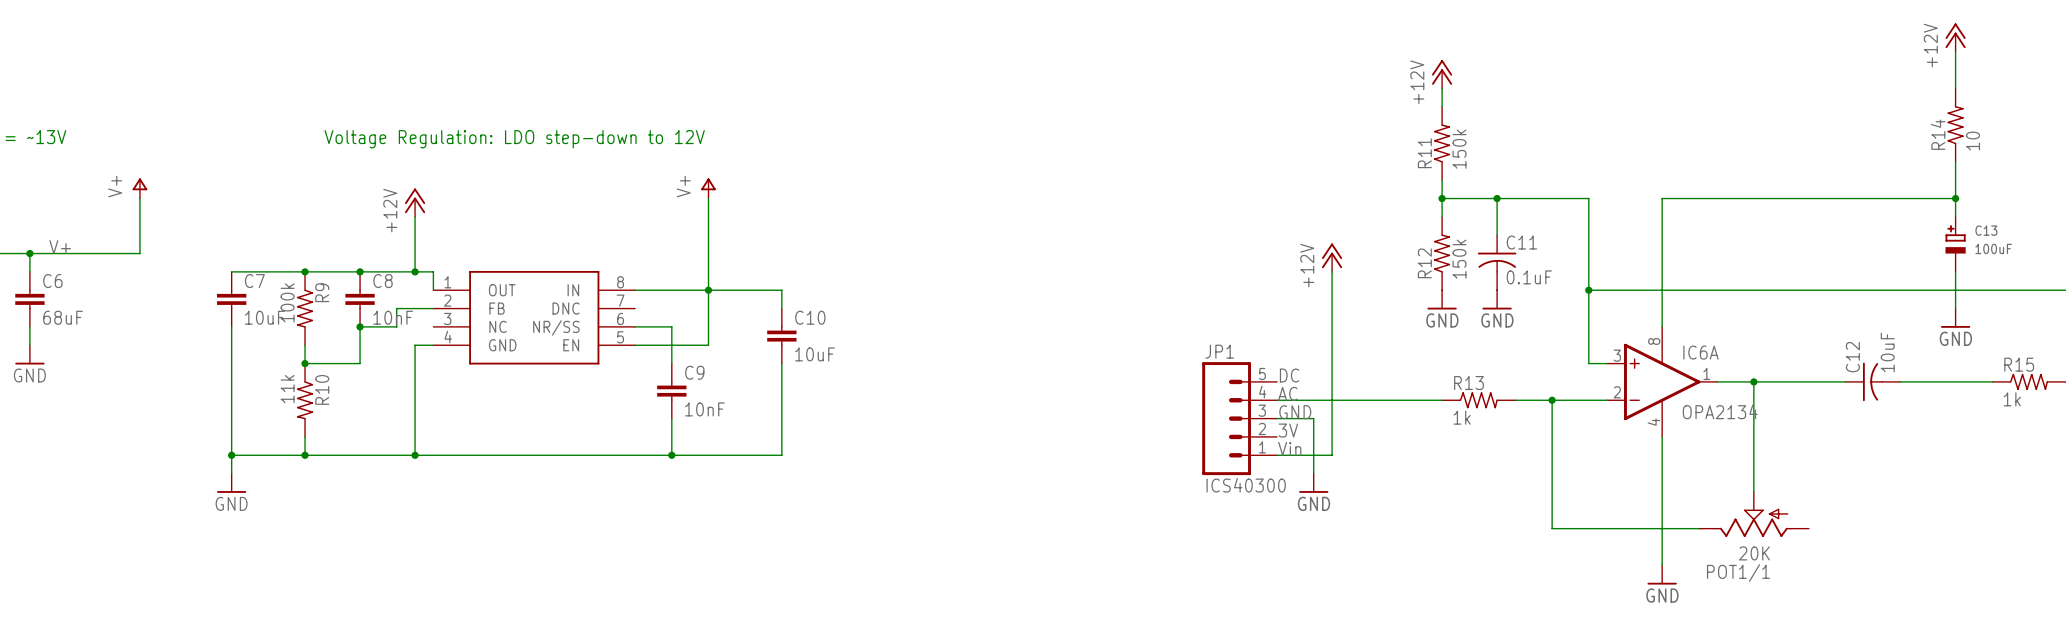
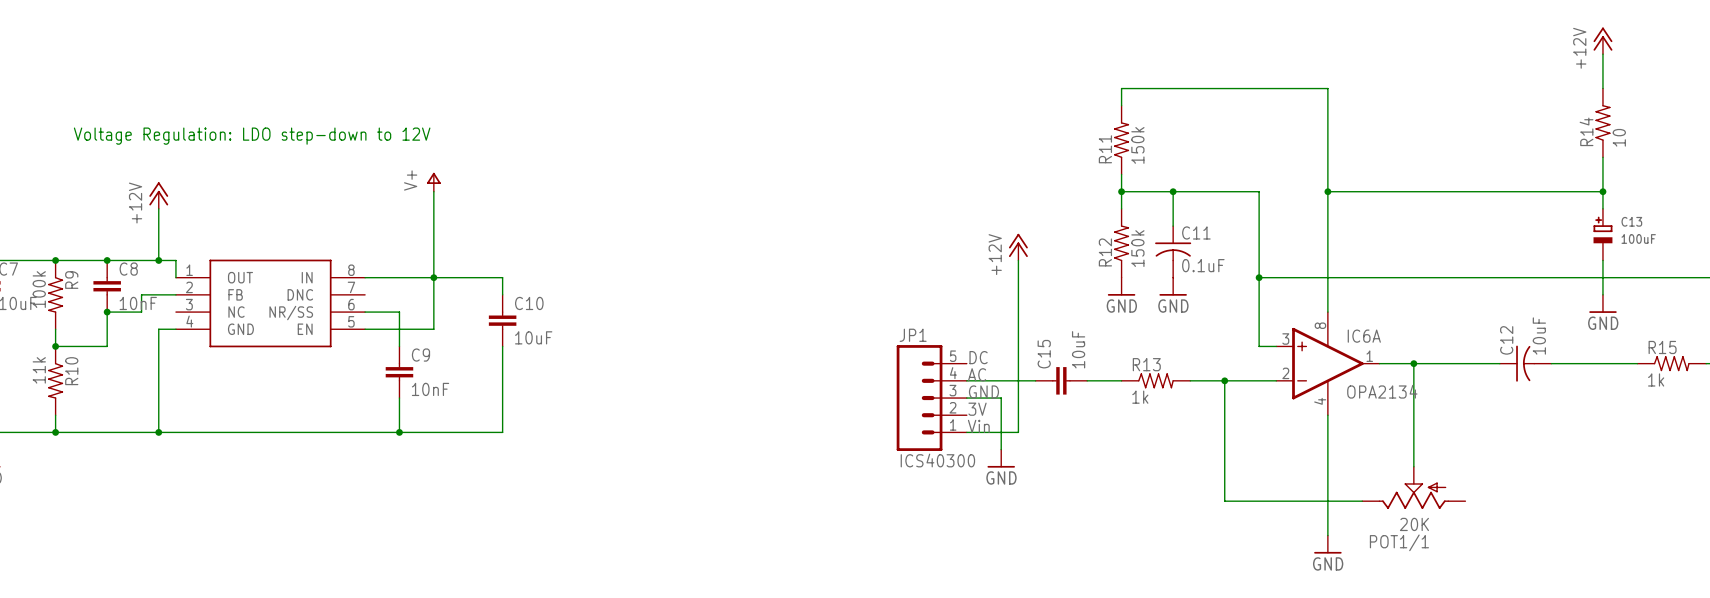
power symbol: +12V (1442, 74) -> none
wire: none -> (1121, 88) (1327, 88) (1327, 191)
junction: none -> (1327, 191)
C15: none -> 10uF (1061, 380)

